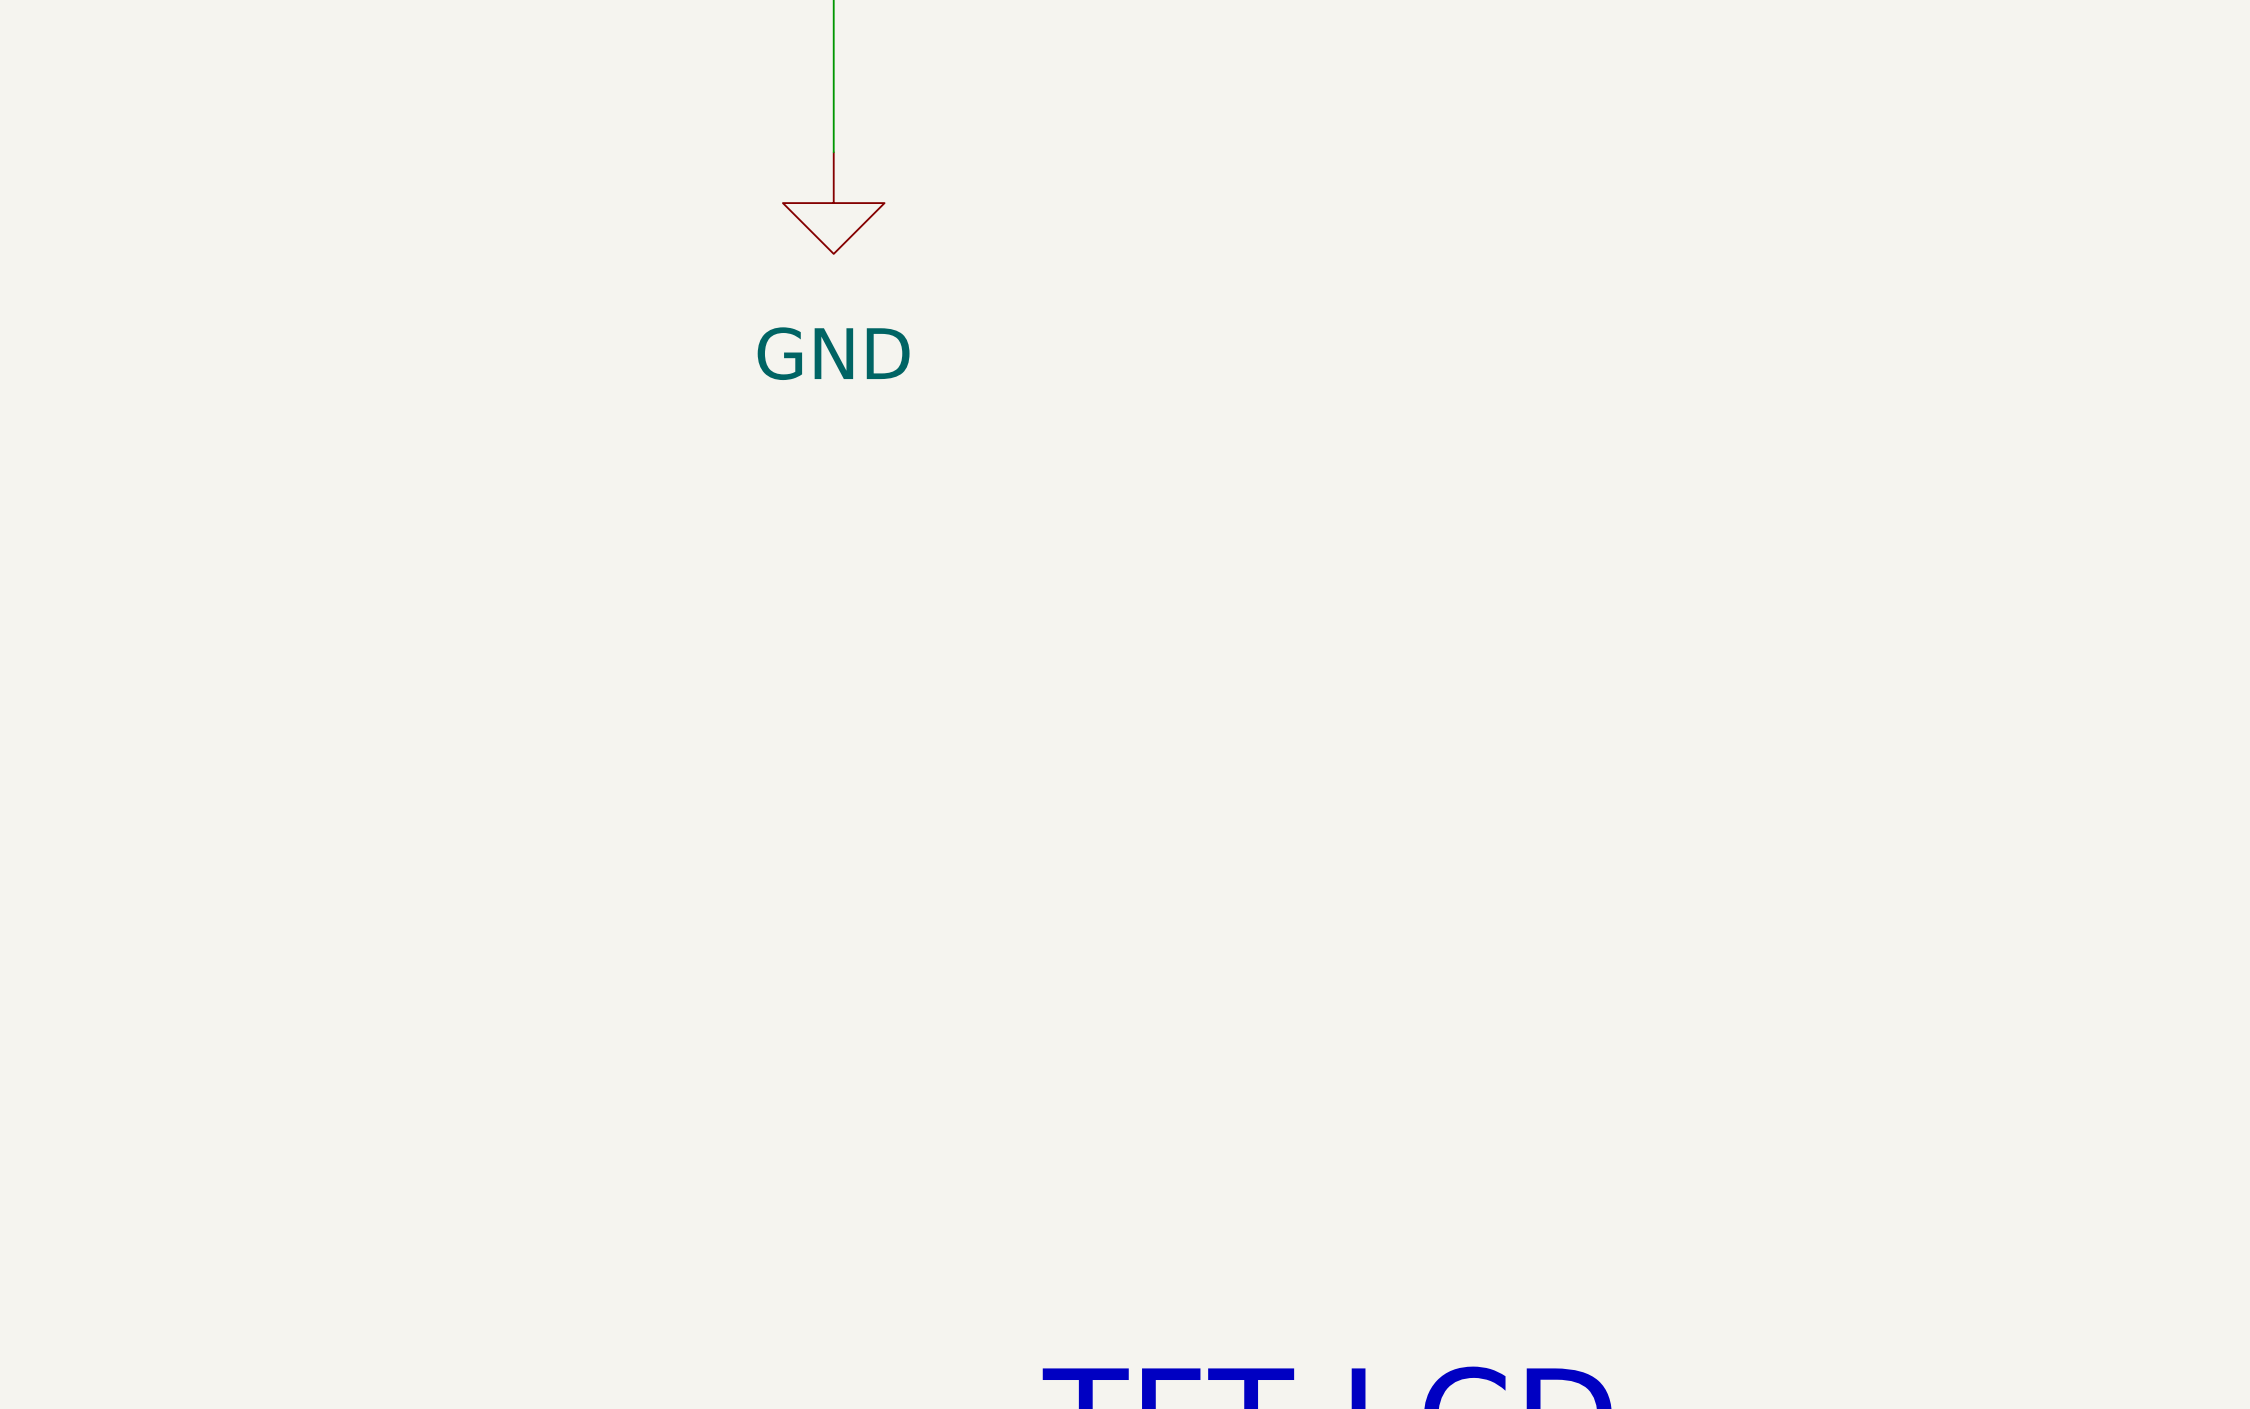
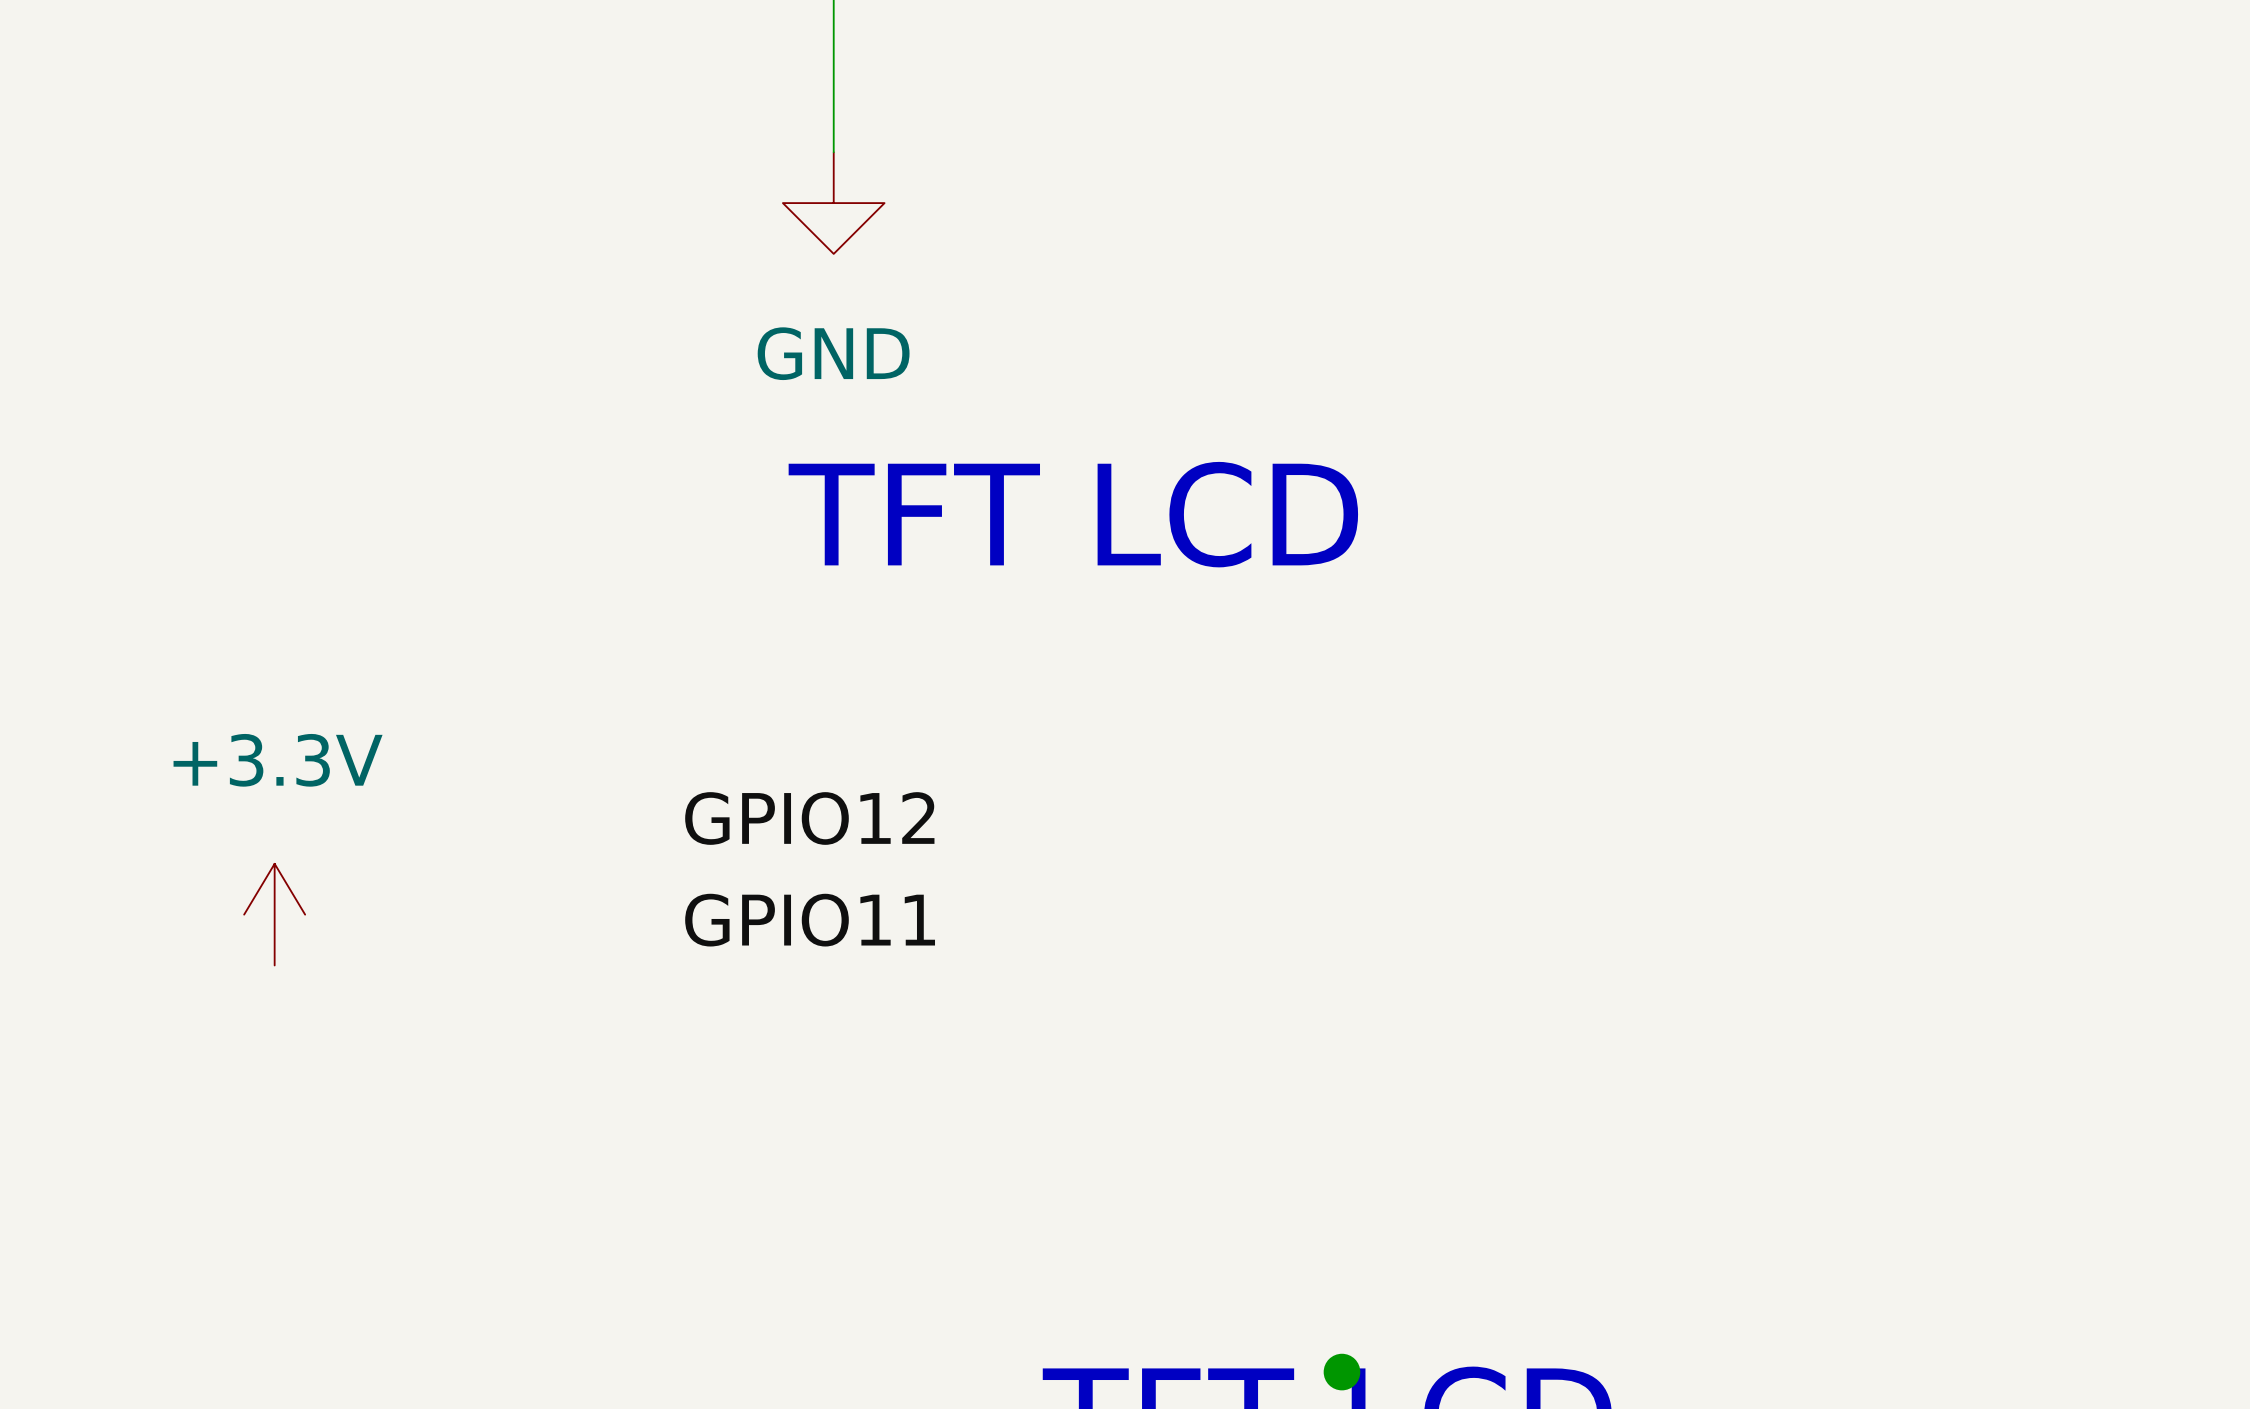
text: none -> TFT LCD (1073, 514)
label: none -> GPIO12 (809, 818)
power symbol: none -> +3.3V (274, 914)
label: none -> GPIO11 (810, 920)
junction: none -> (1341, 1372)

